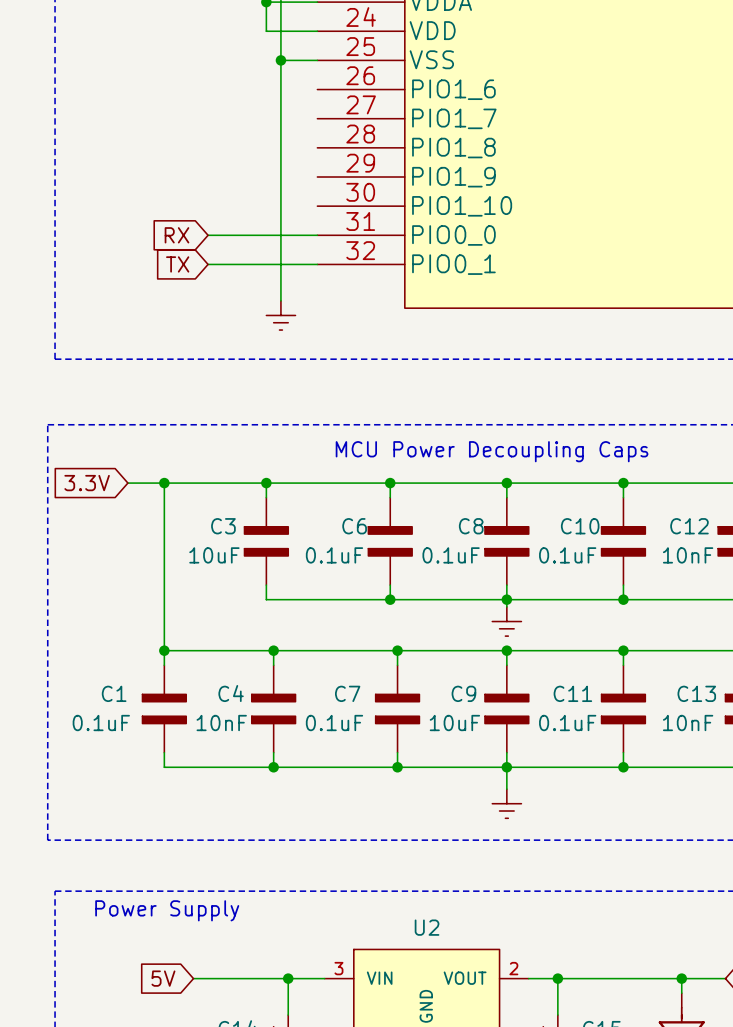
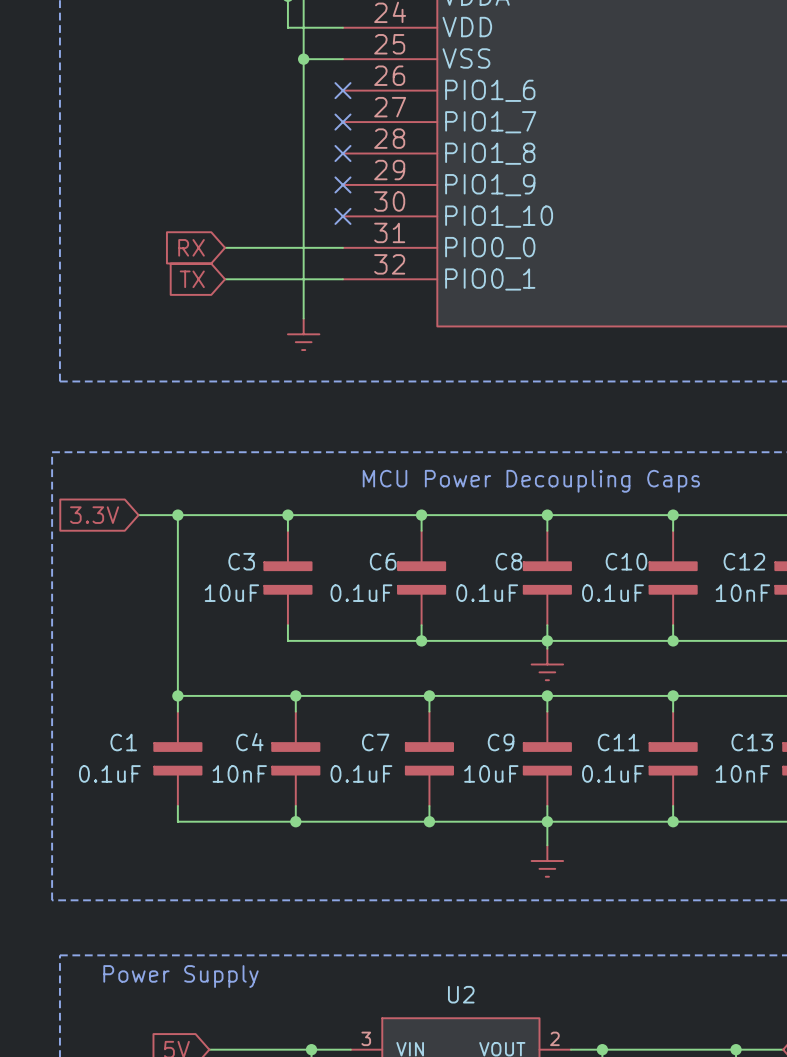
no-connect mark: none -> (342, 90)
no-connect mark: none -> (342, 122)
no-connect mark: none -> (342, 153)
no-connect mark: none -> (342, 184)
no-connect mark: none -> (342, 216)

